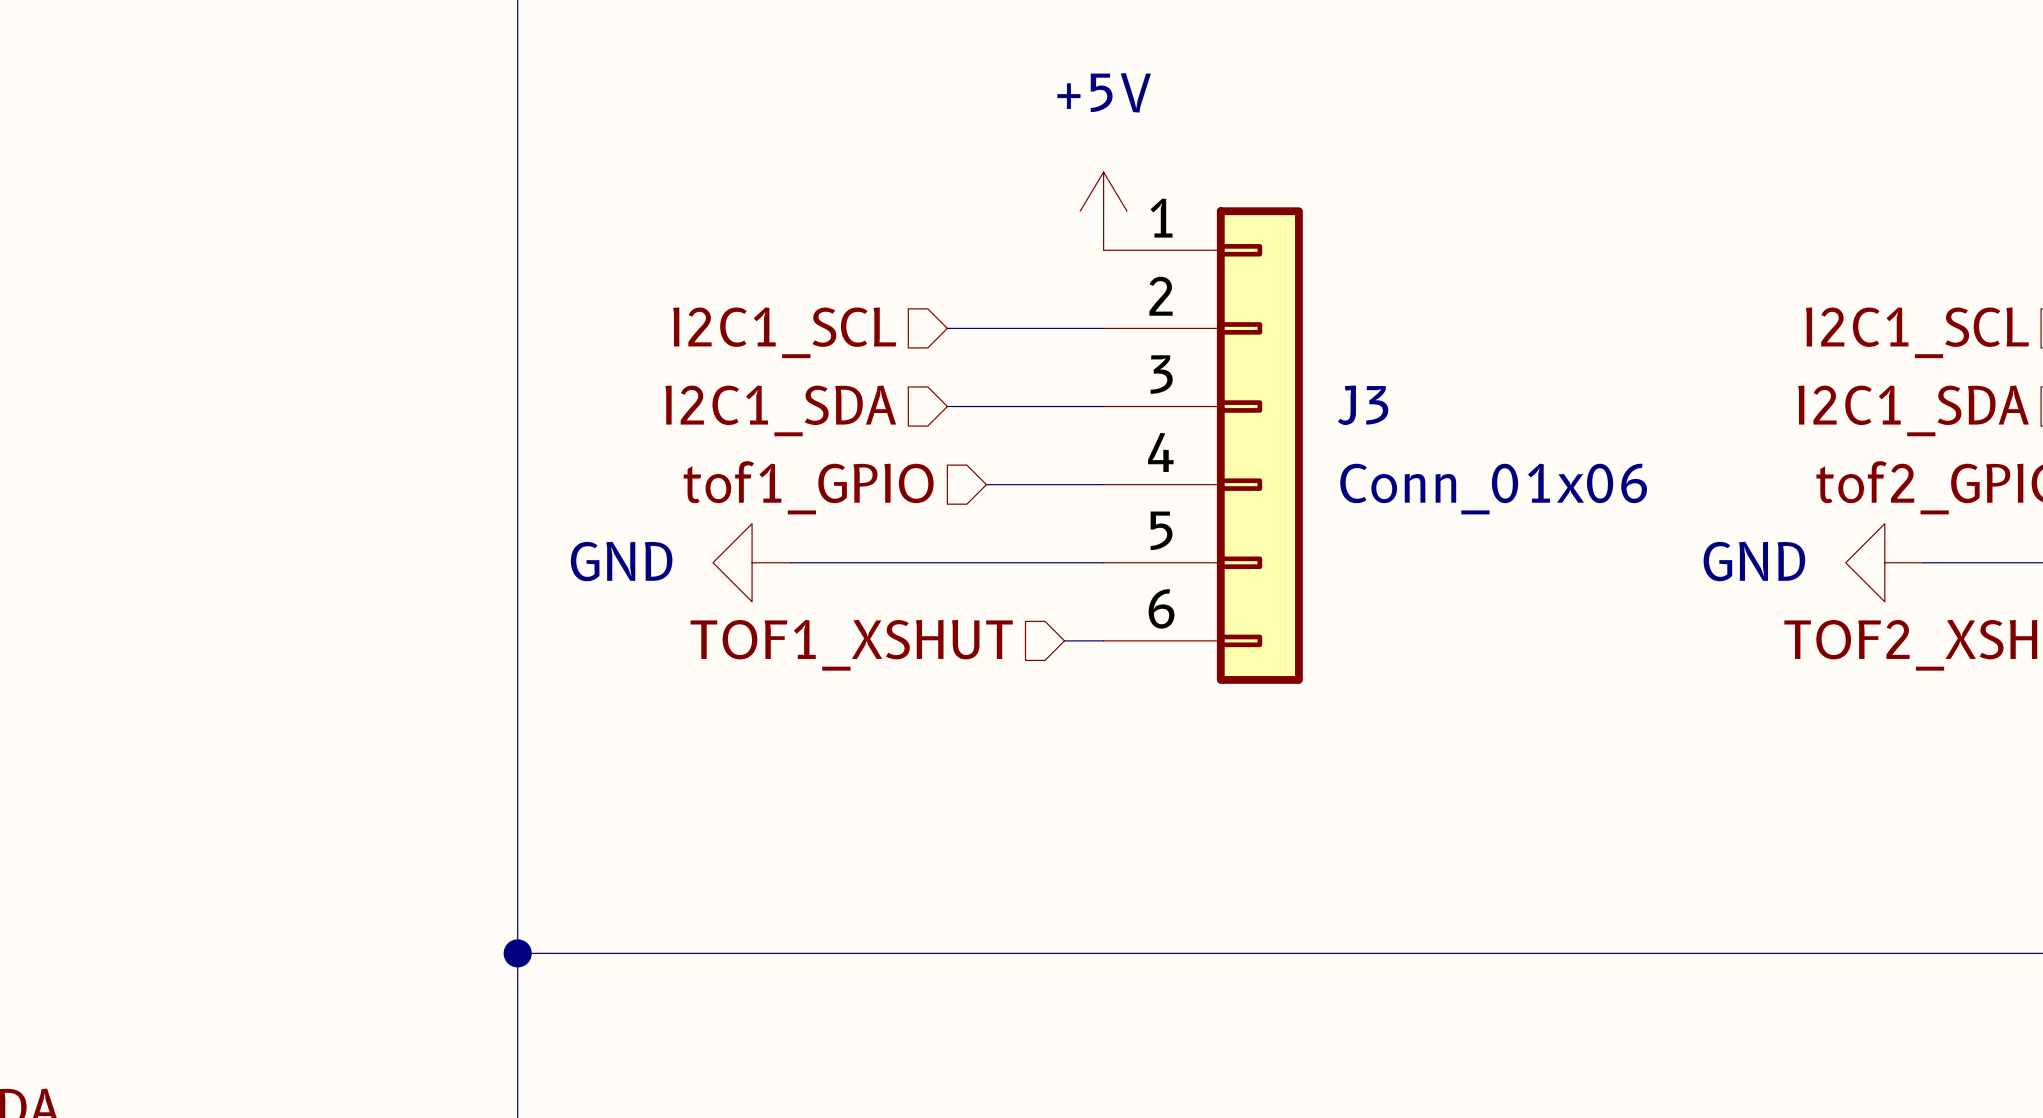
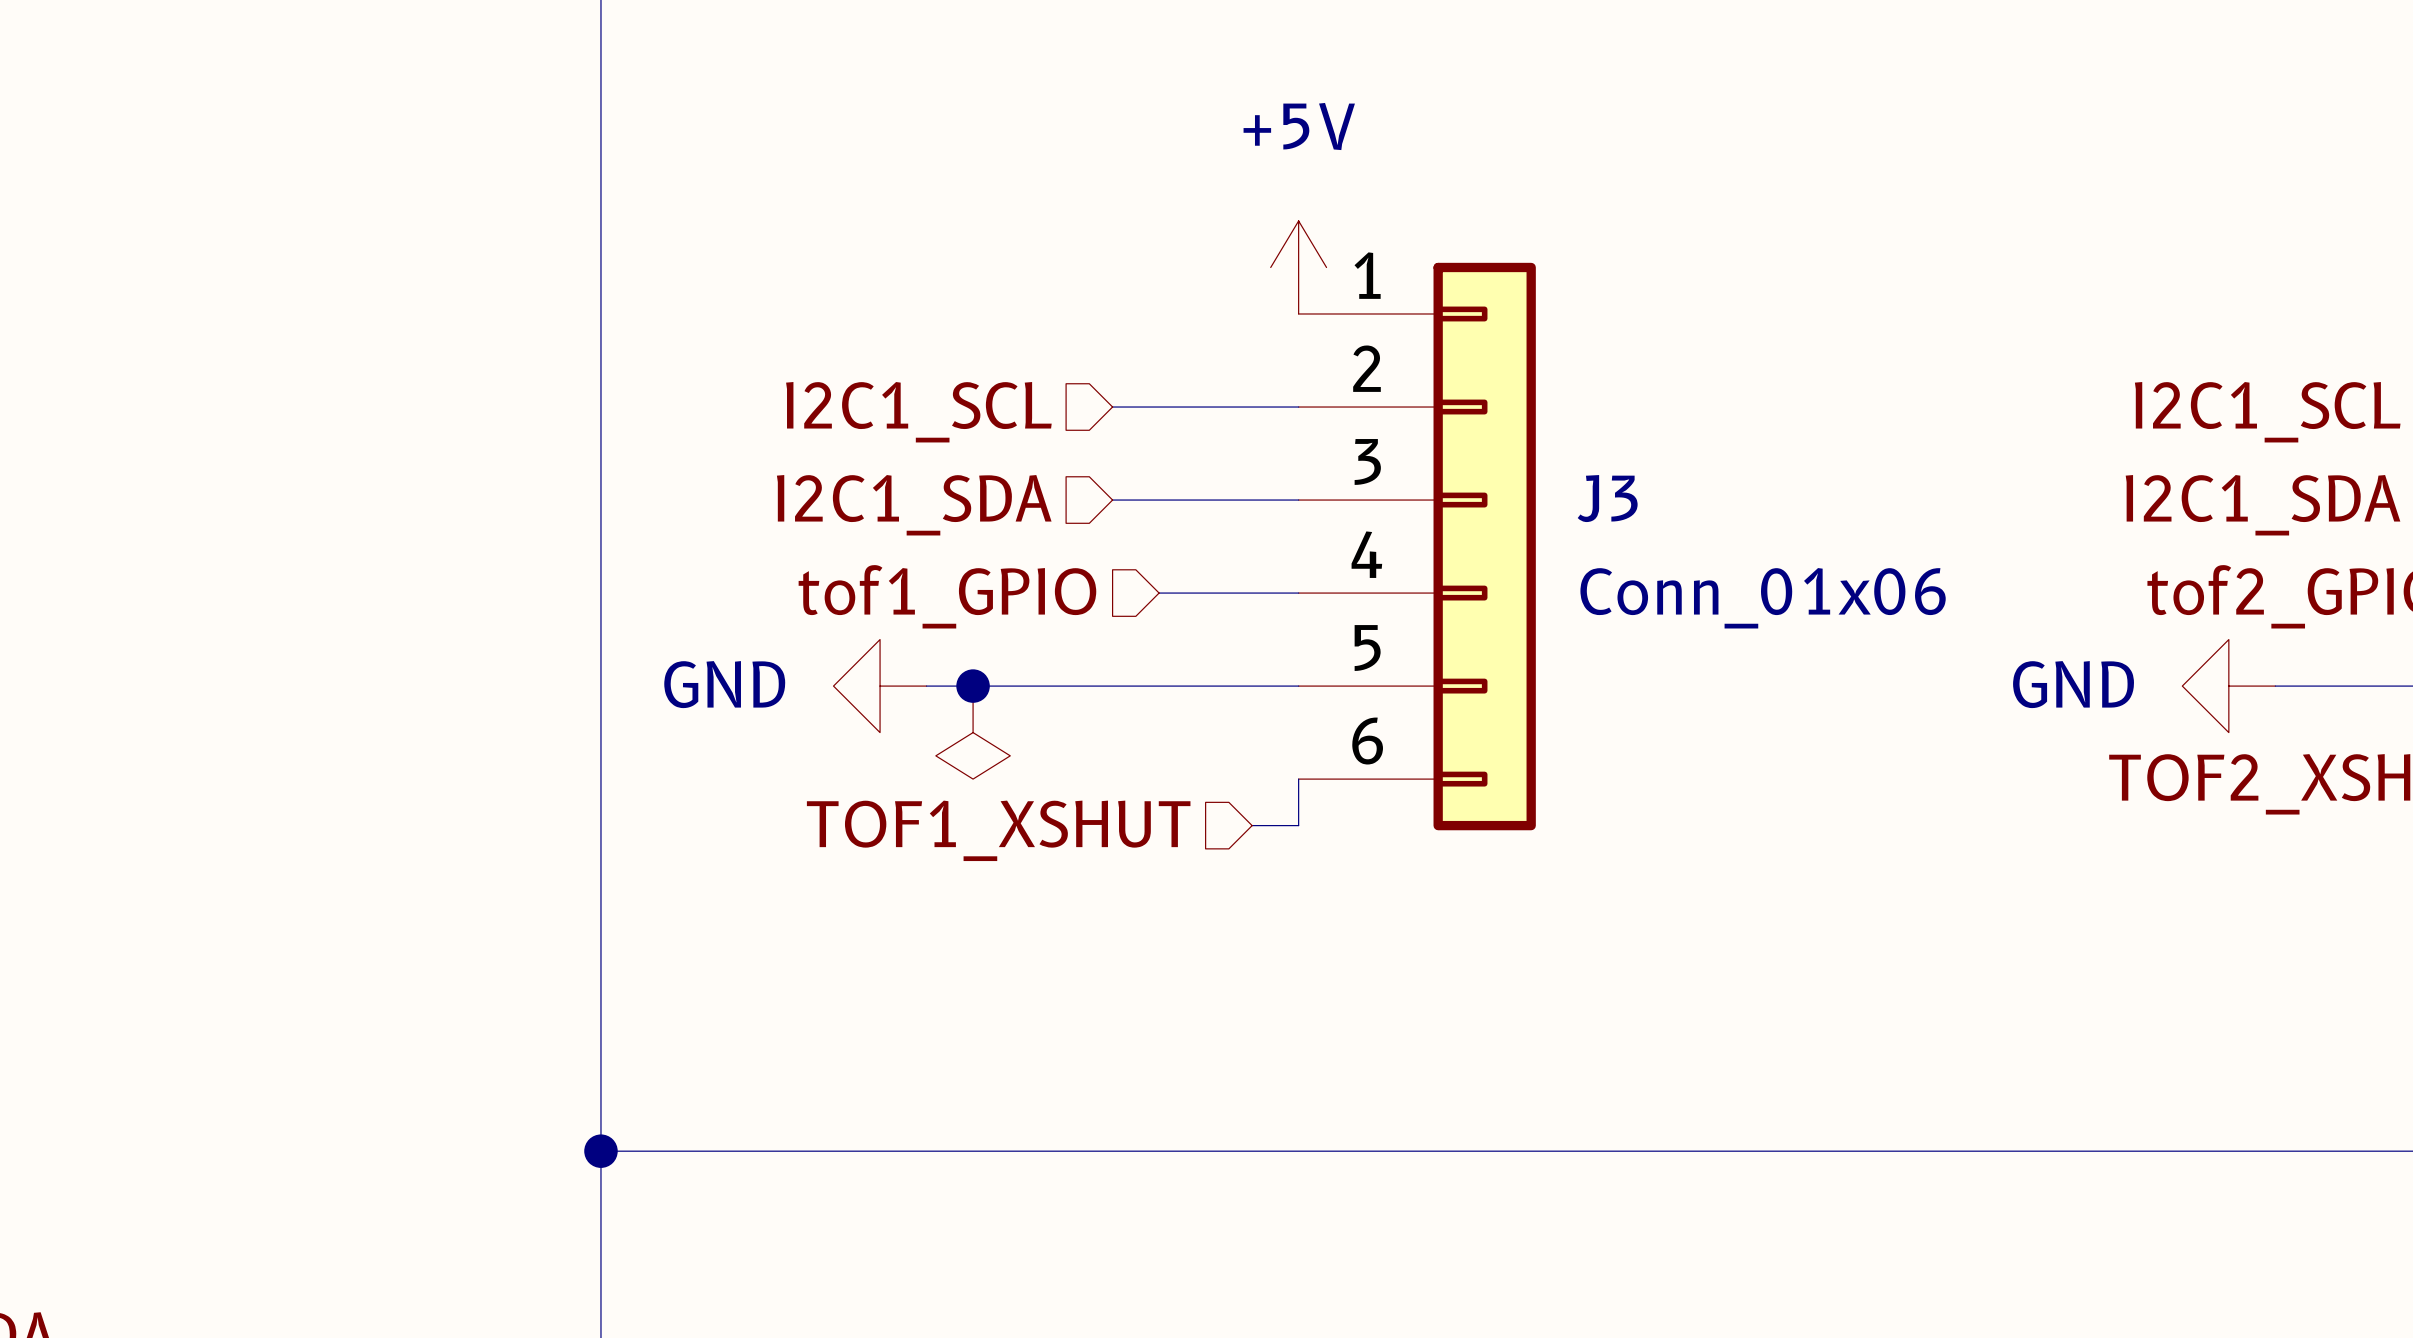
junction: none -> (973, 686)
power symbol: none -> (973, 732)
wire: (1064, 640) (1103, 640) -> (1252, 825) (1298, 825) (1298, 779)
hierarchical label position: TOF1_XSHUT (851, 645) -> TOF1_XSHUT (998, 830)

